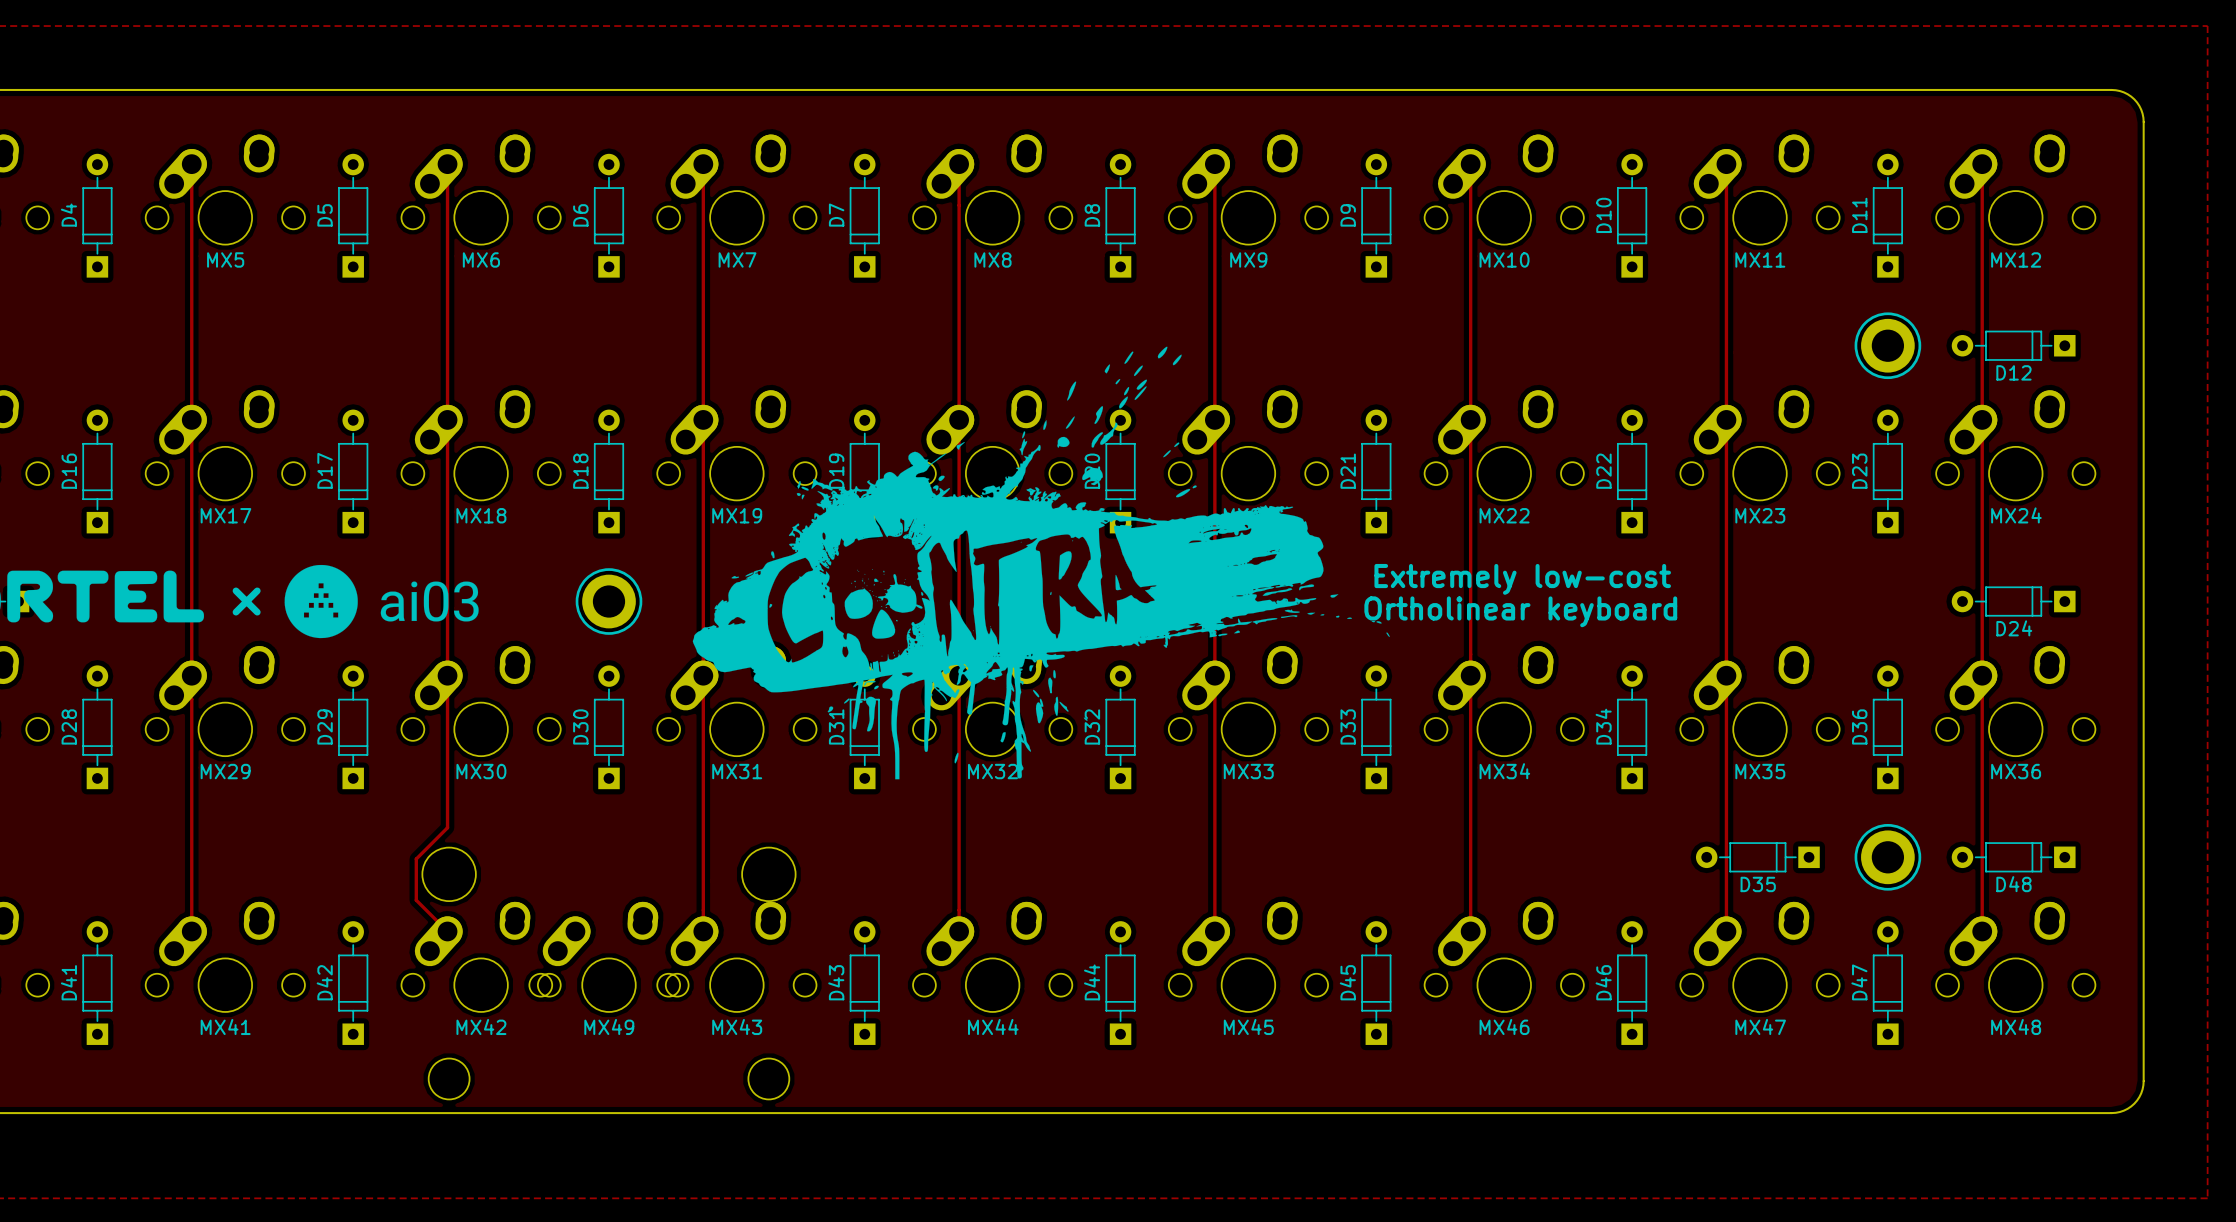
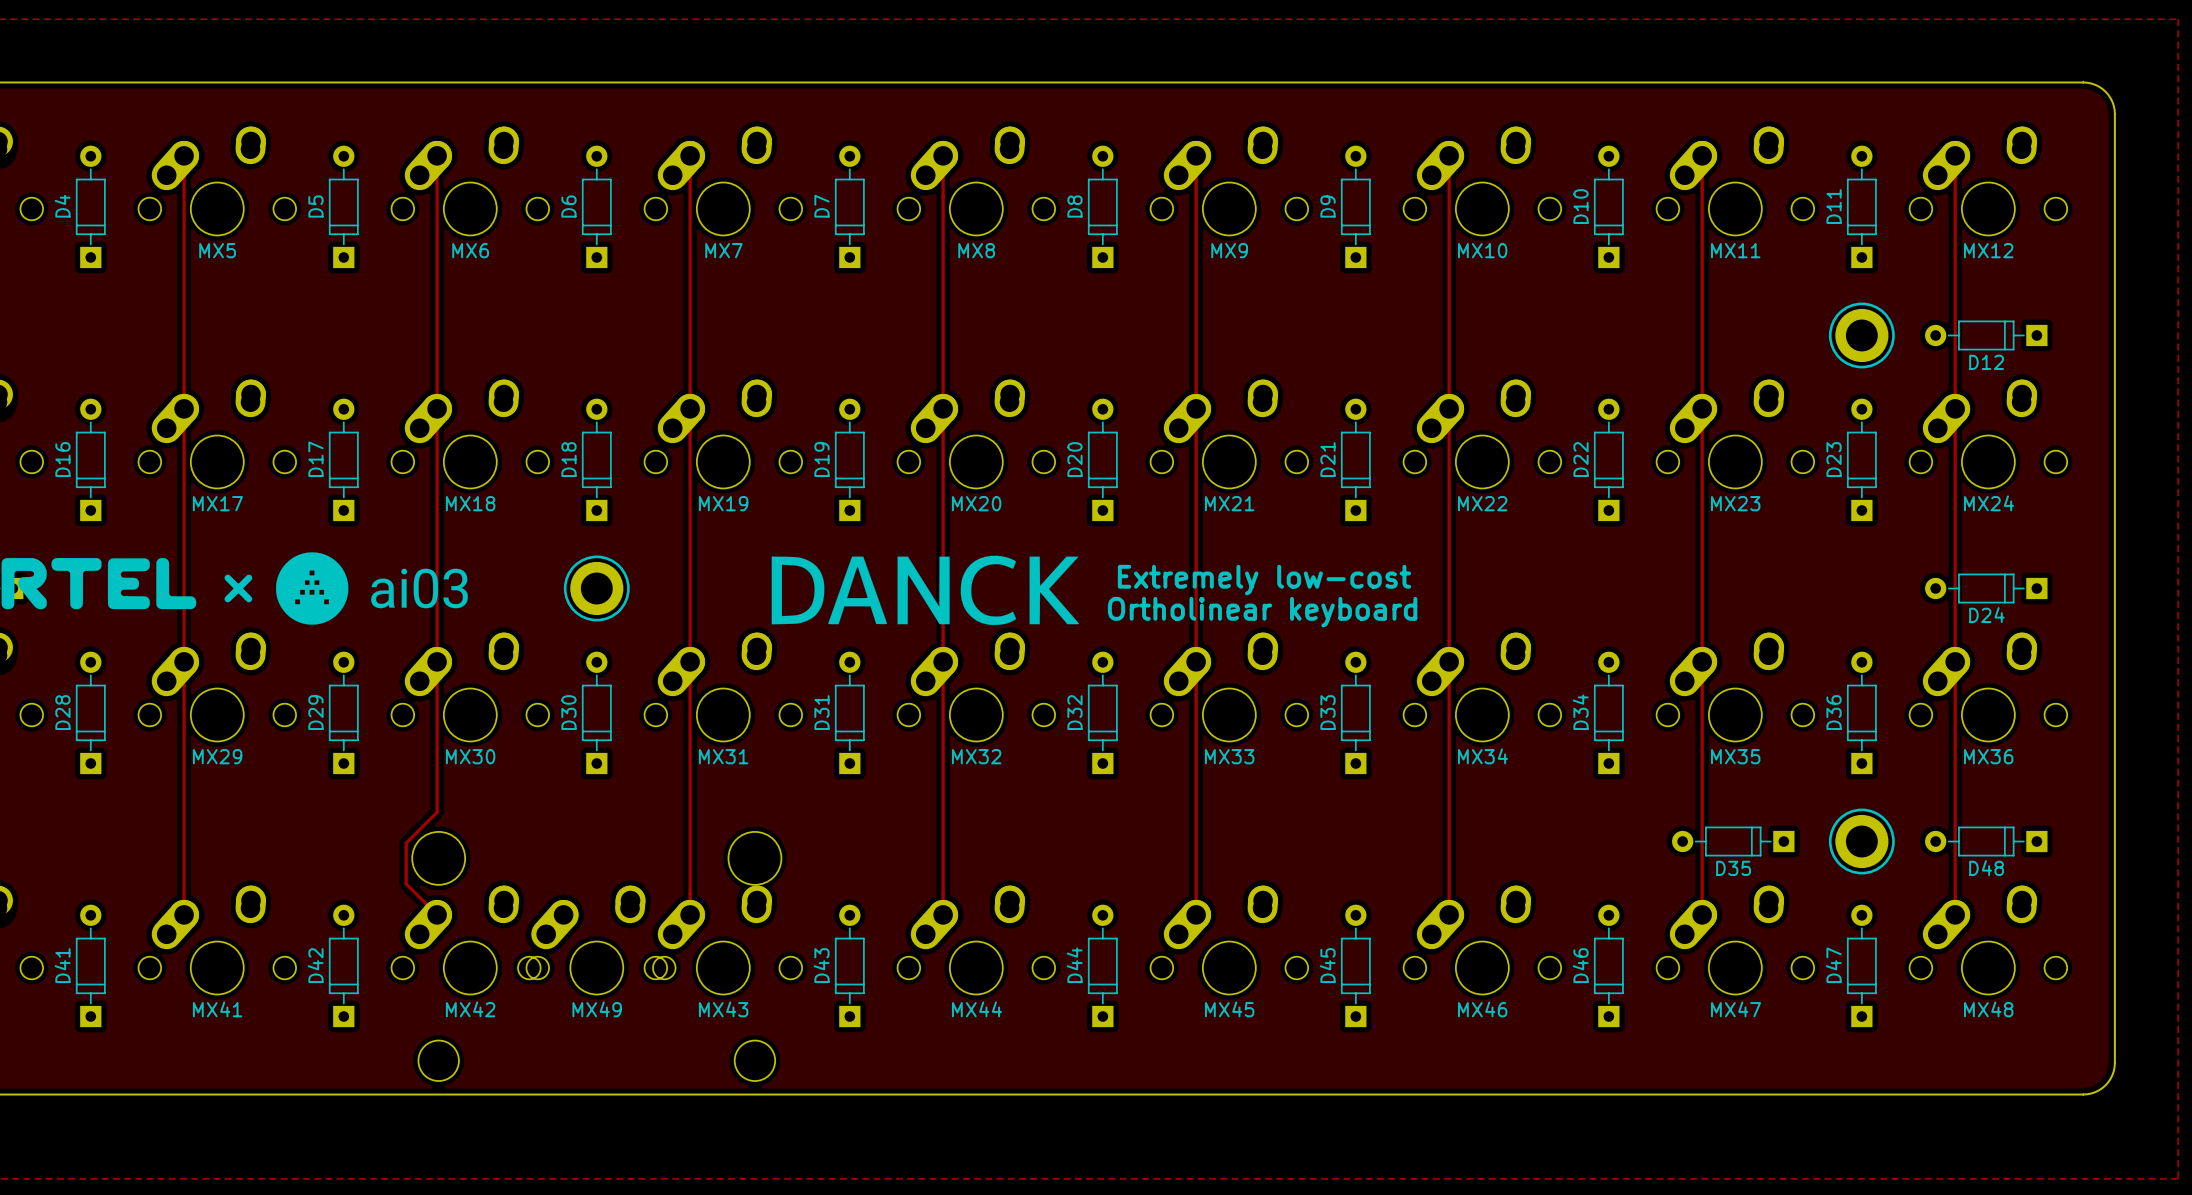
drawing: [692, 346, 1390, 780] -> none
drawing: none -> [771, 555, 1080, 626]
text position: Extremely low-cost (1522, 579) -> Extremely low-cost (1264, 580)
text position: Ortholinear keyboard (1520, 611) -> Ortholinear keyboard (1262, 612)

